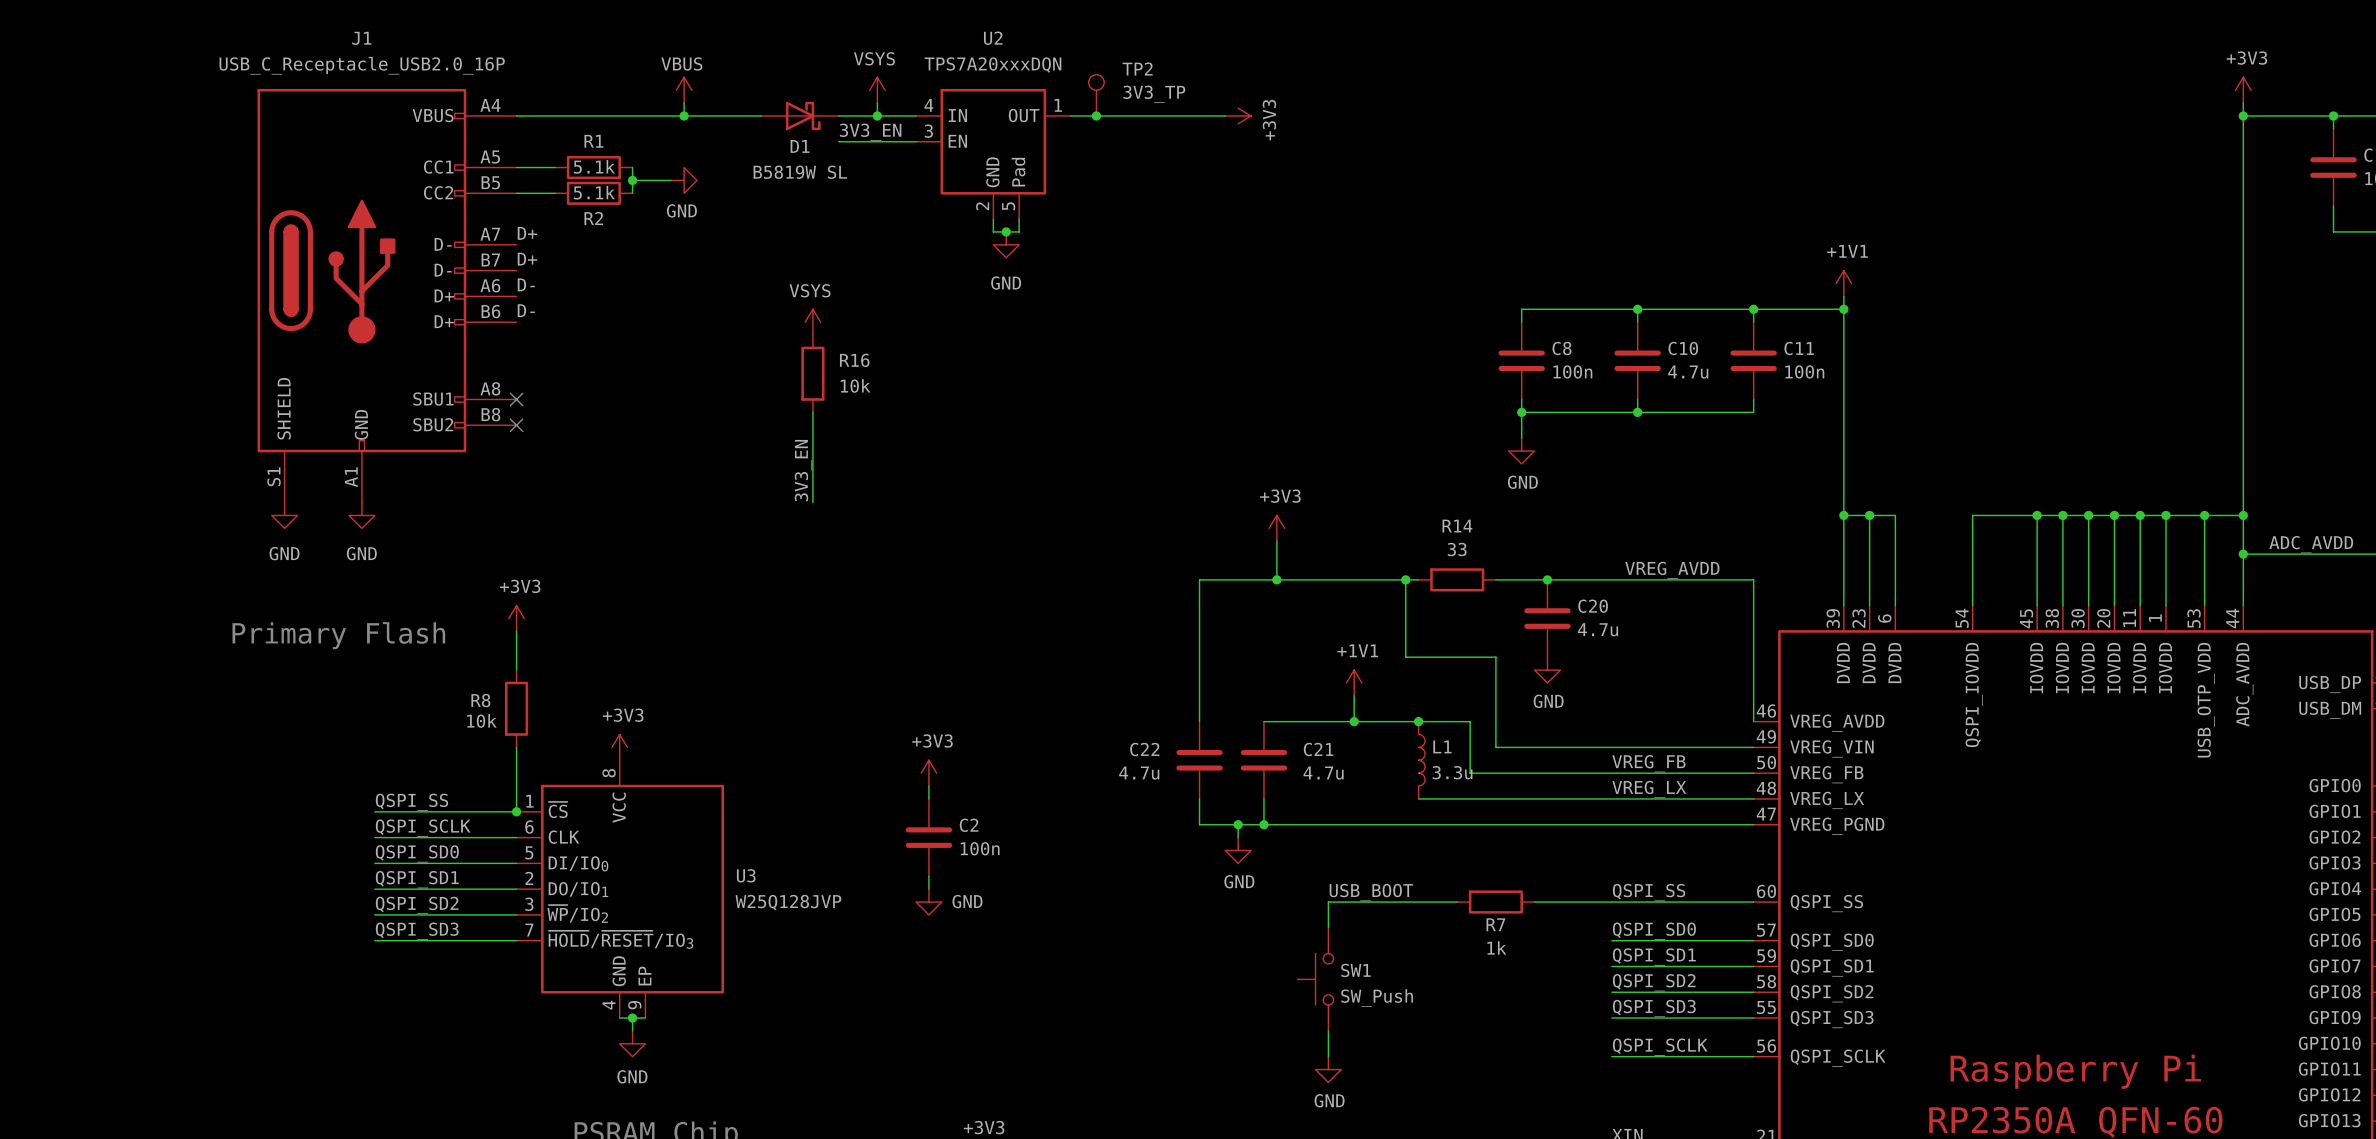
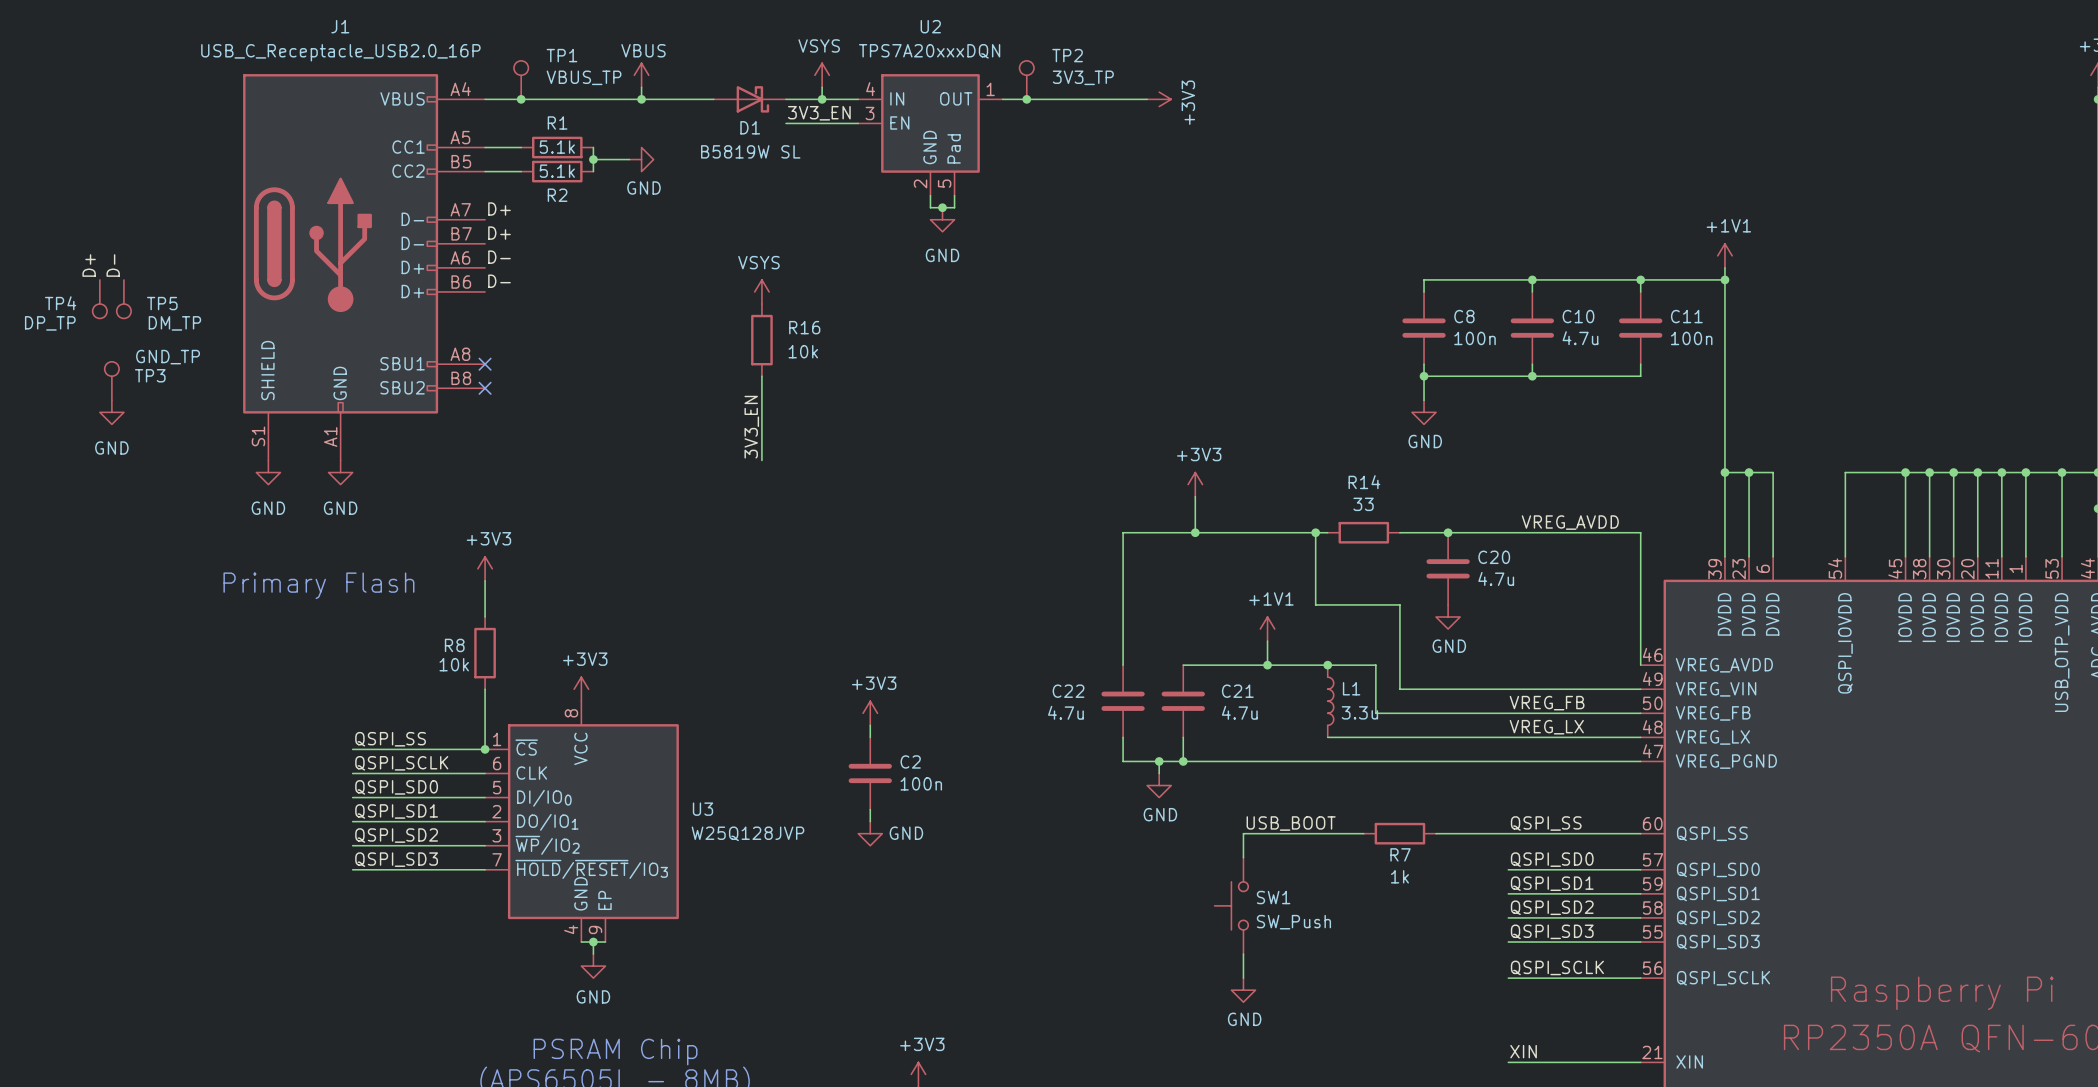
TP1: none -> VBUS_TP (521, 80)
junction: none -> (521, 99)
label: none -> D+ (89, 265)
label: none -> D- (113, 265)
TP4: none -> DP_TP (99, 299)
TP5: none -> DM_TP (123, 299)
TP3: none -> GND_TP (111, 381)
power symbol: none -> GND (111, 412)

